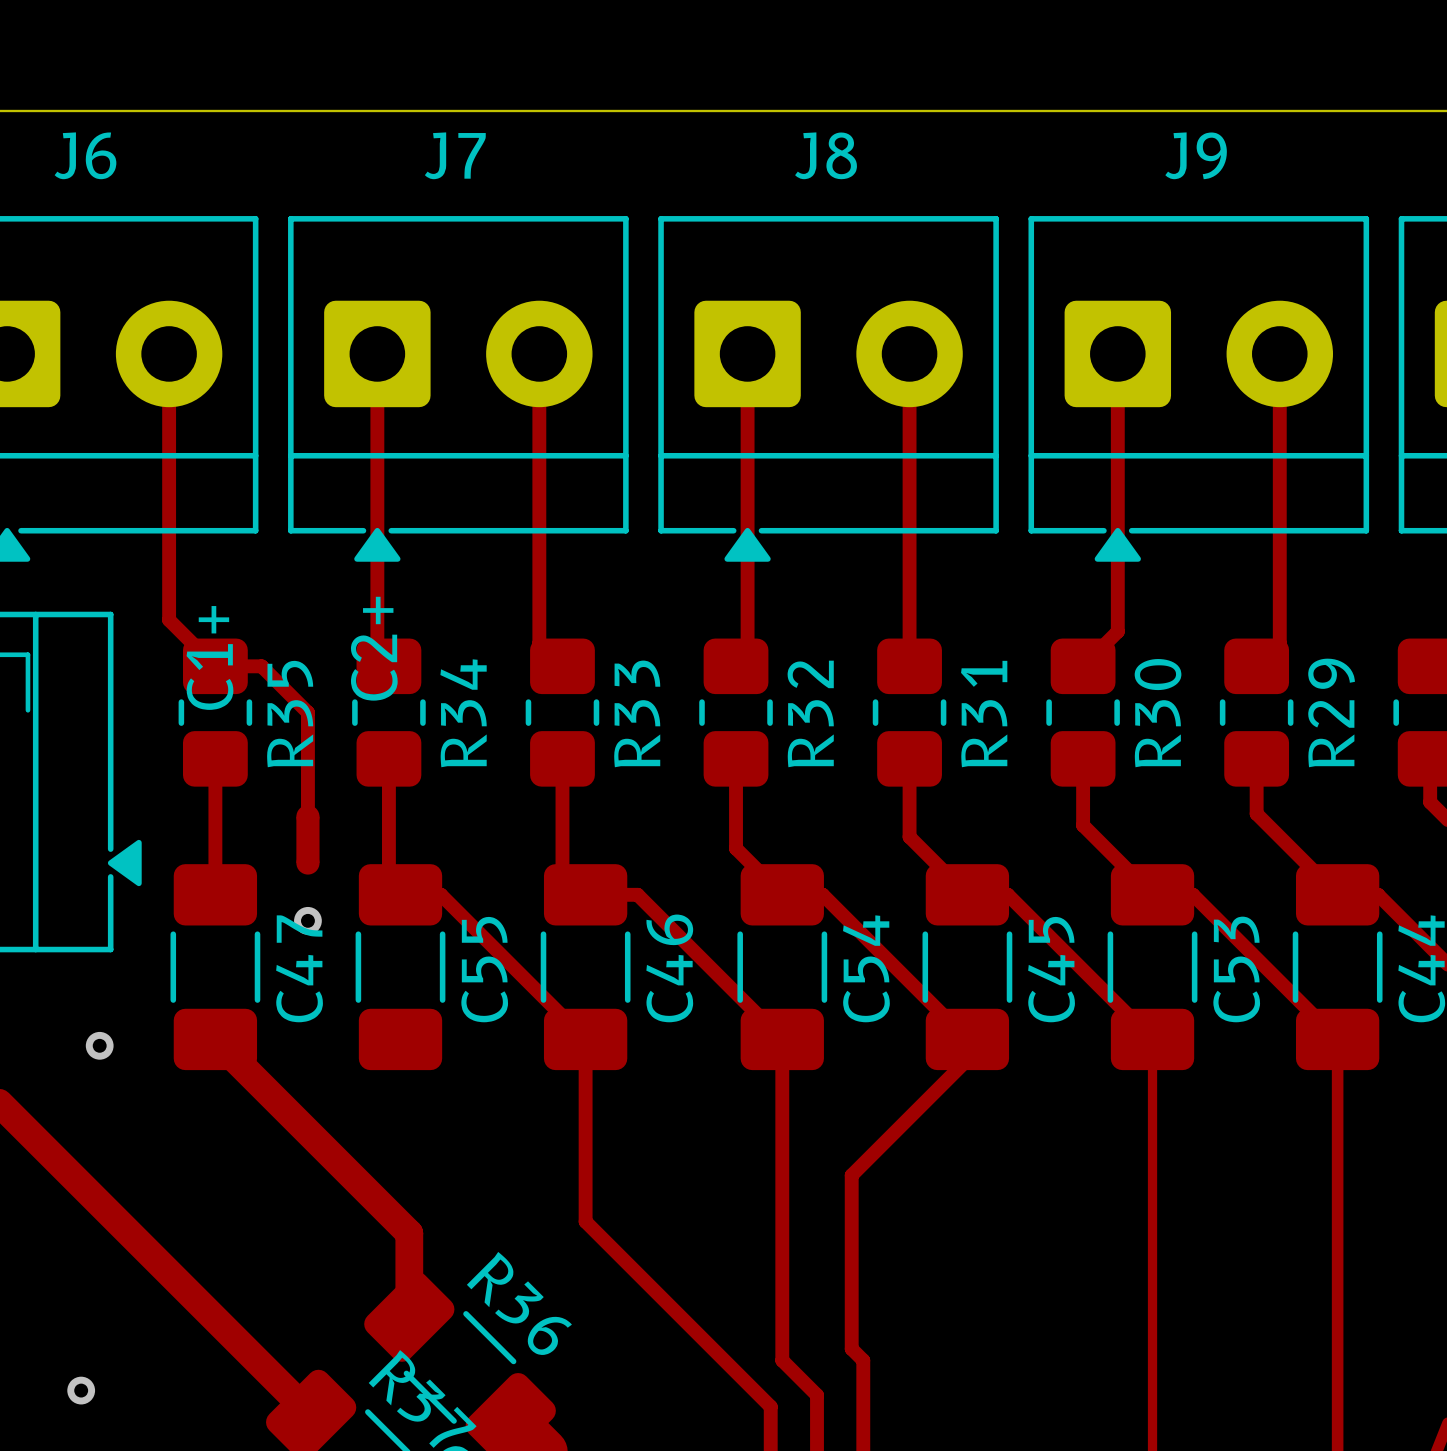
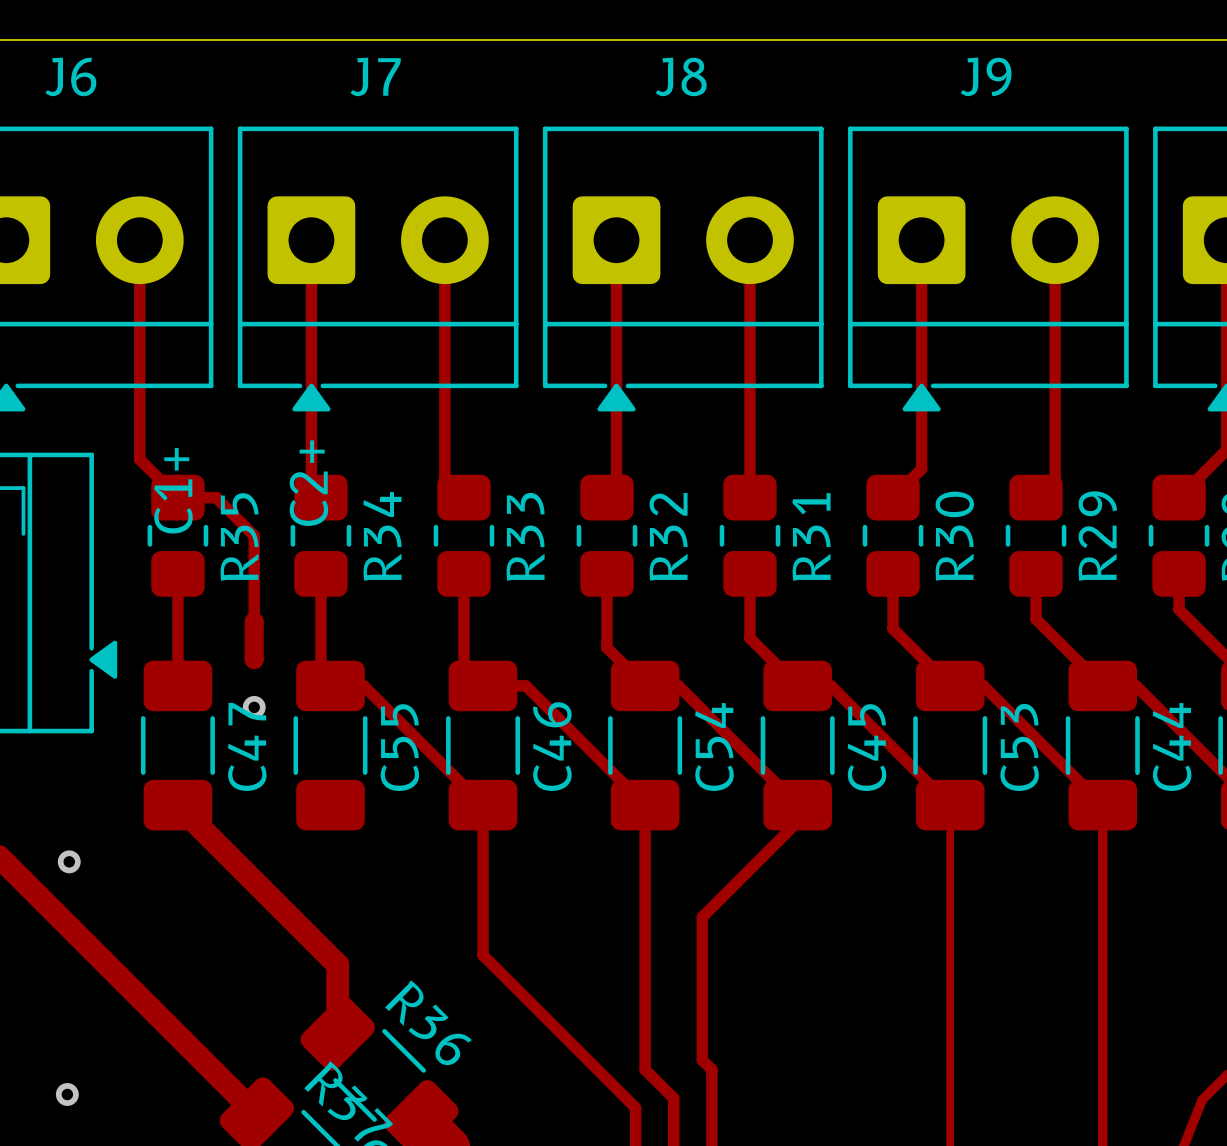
via position: (99, 1045) -> (69, 861)

